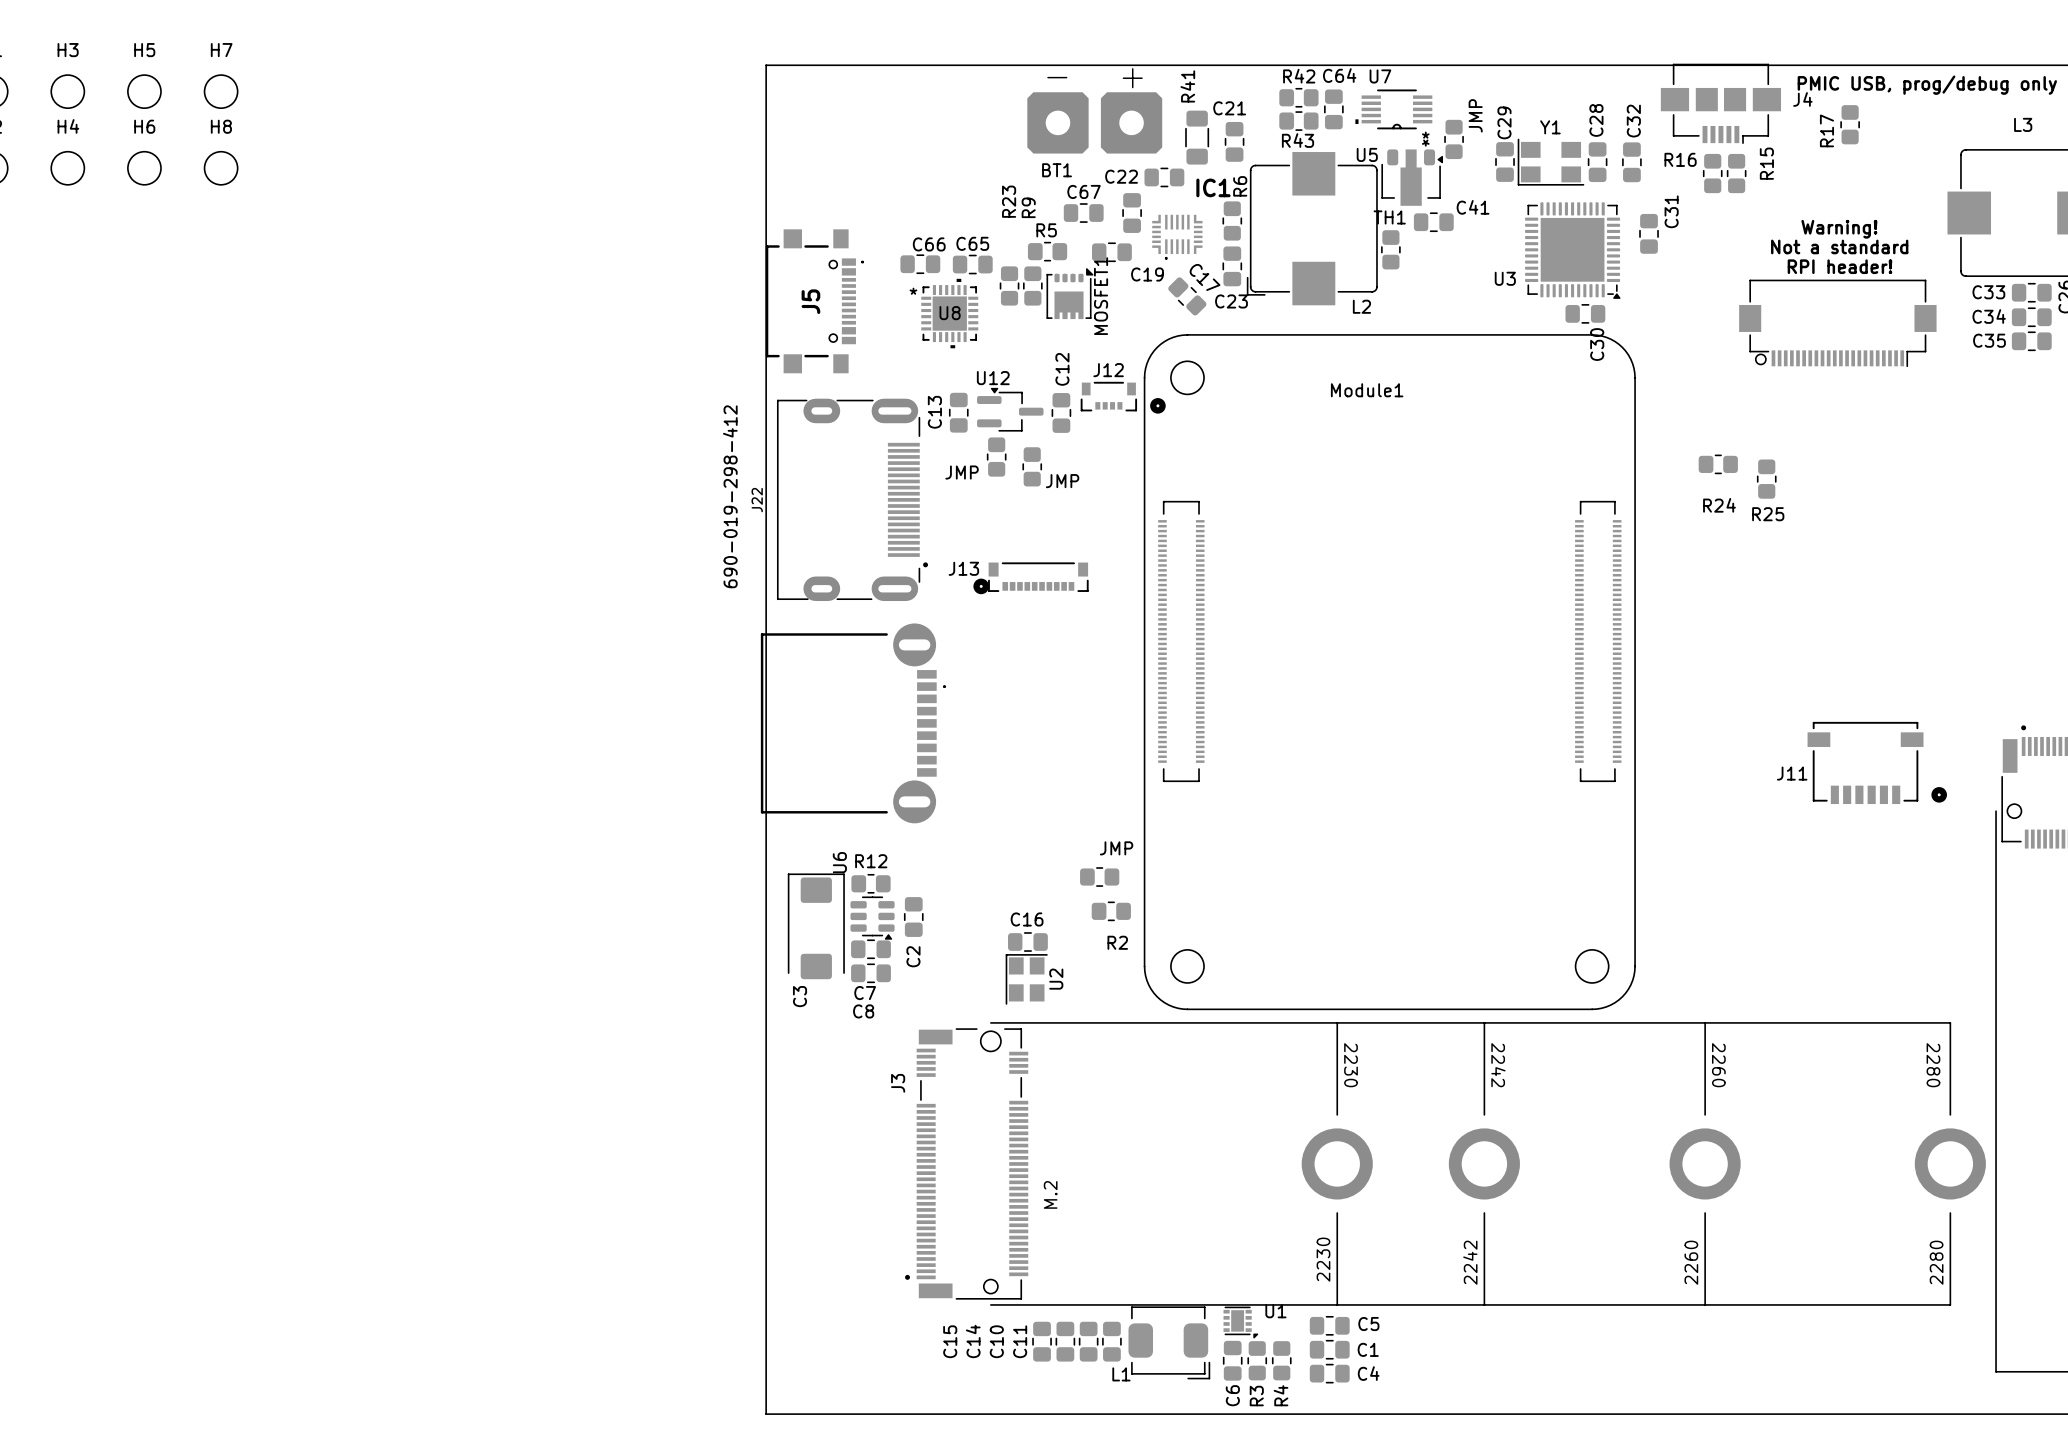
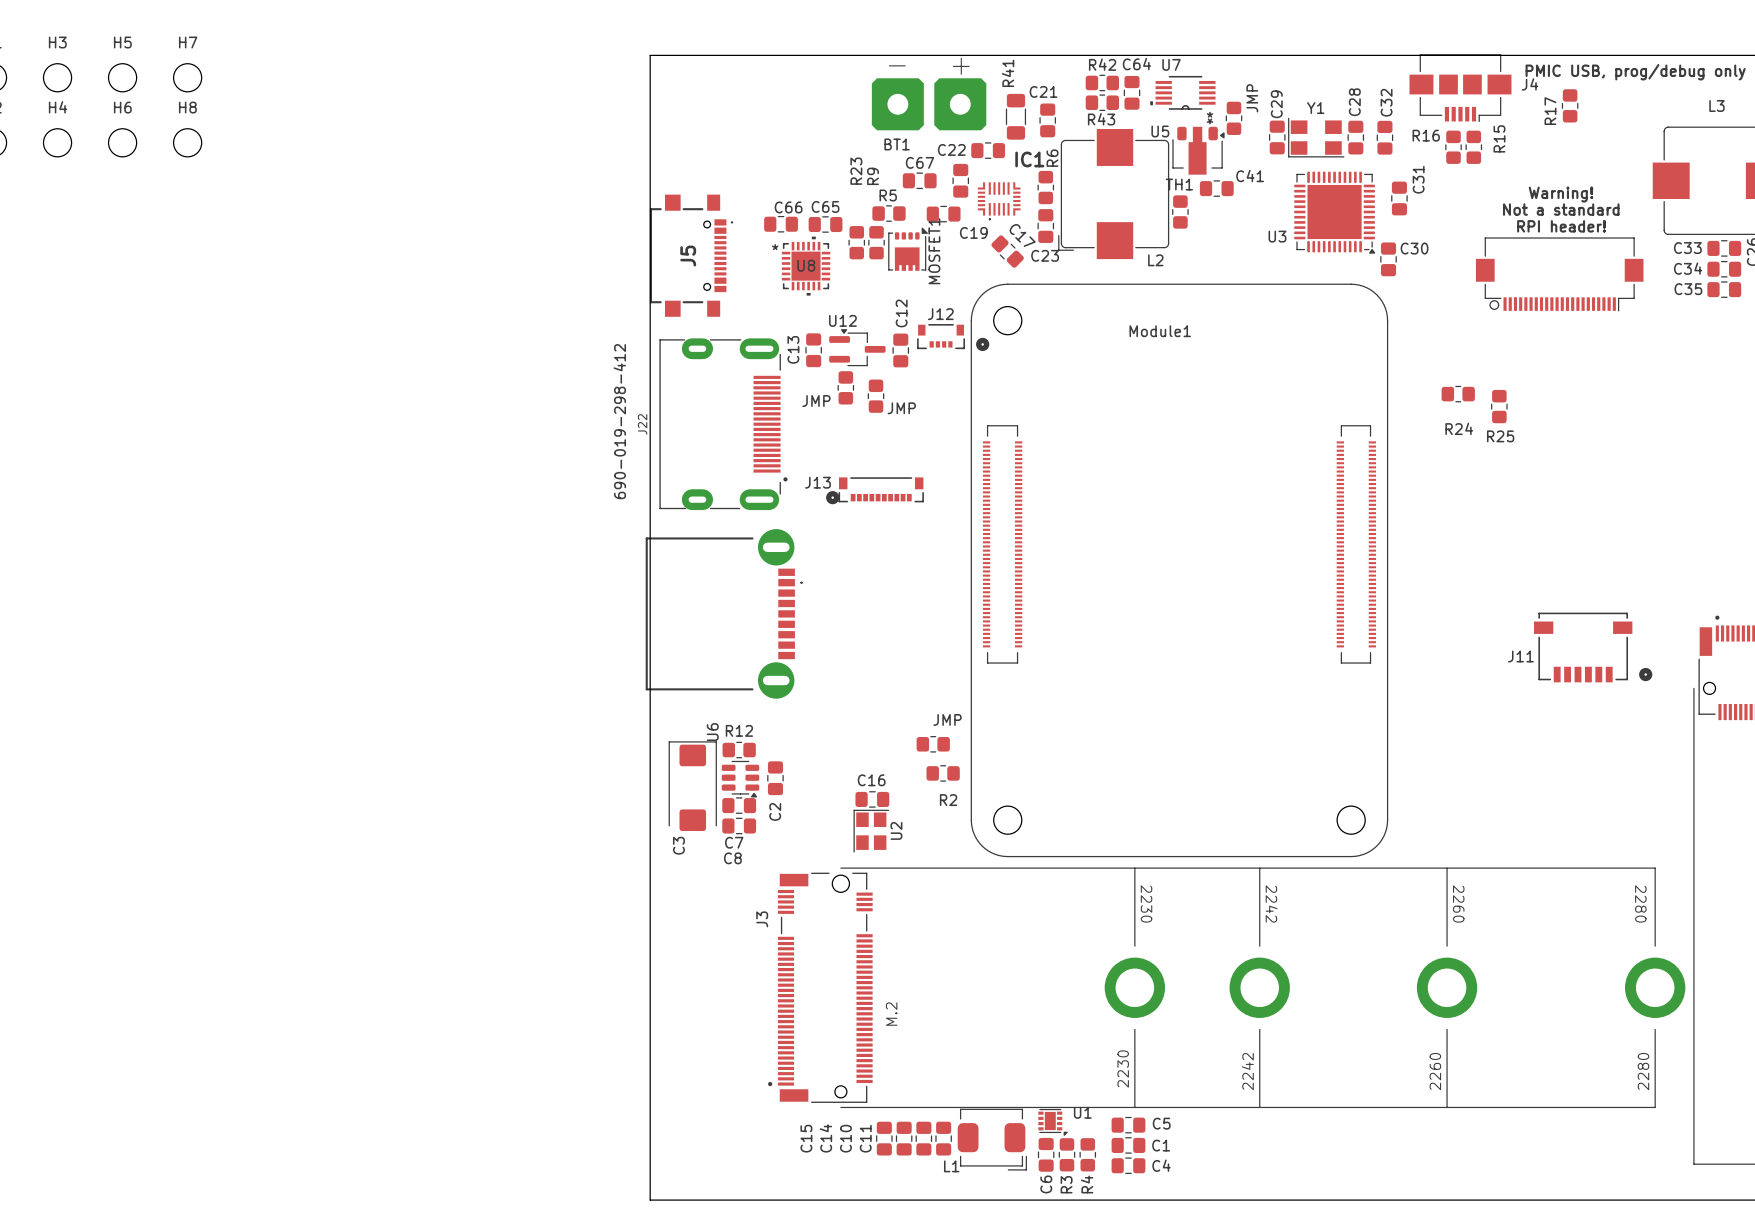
C30 rotation: 0° (1585, 313) -> 90° clockwise (1388, 259)
C30 position: (1585, 313) -> (1388, 259)
C30 name position: C30 (1597, 344) -> C30 (1414, 248)

